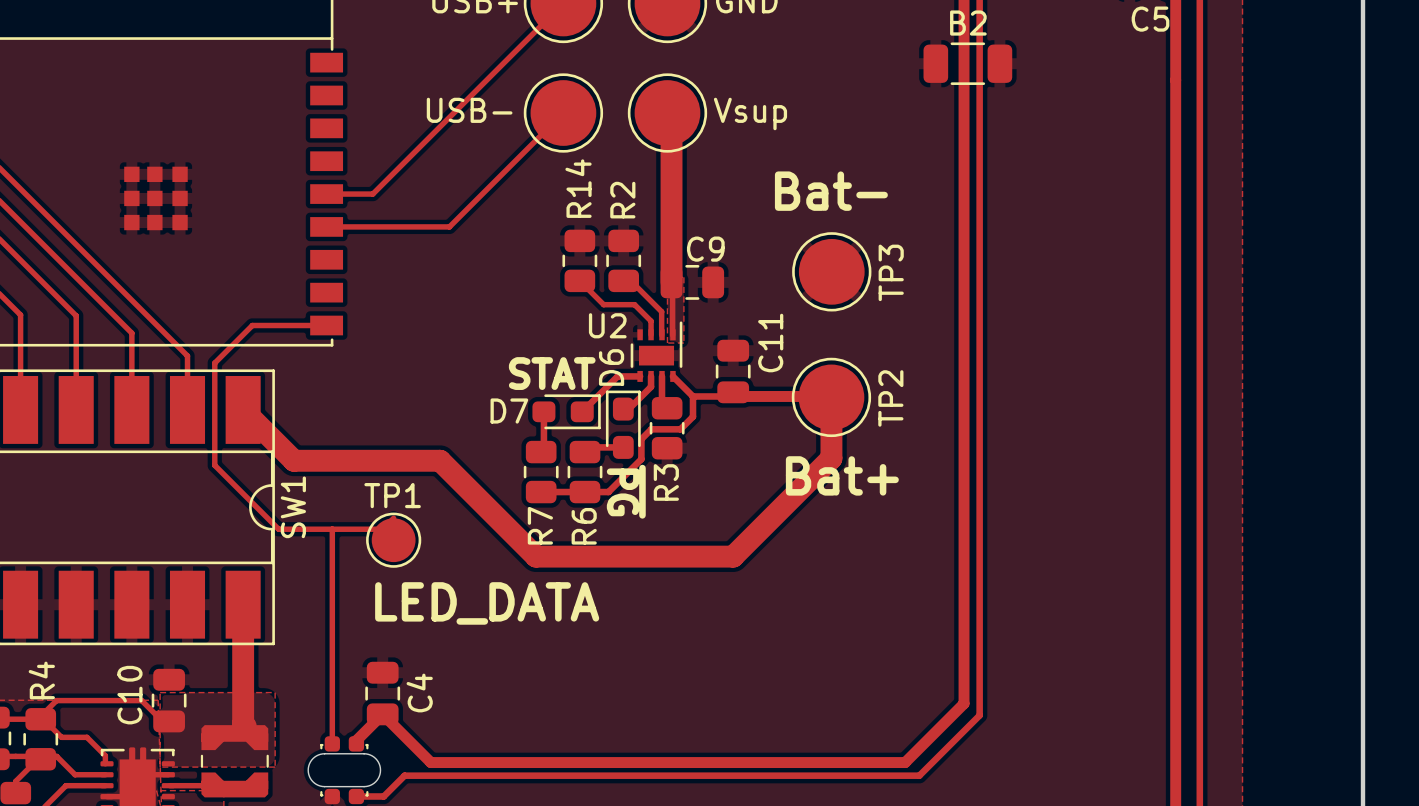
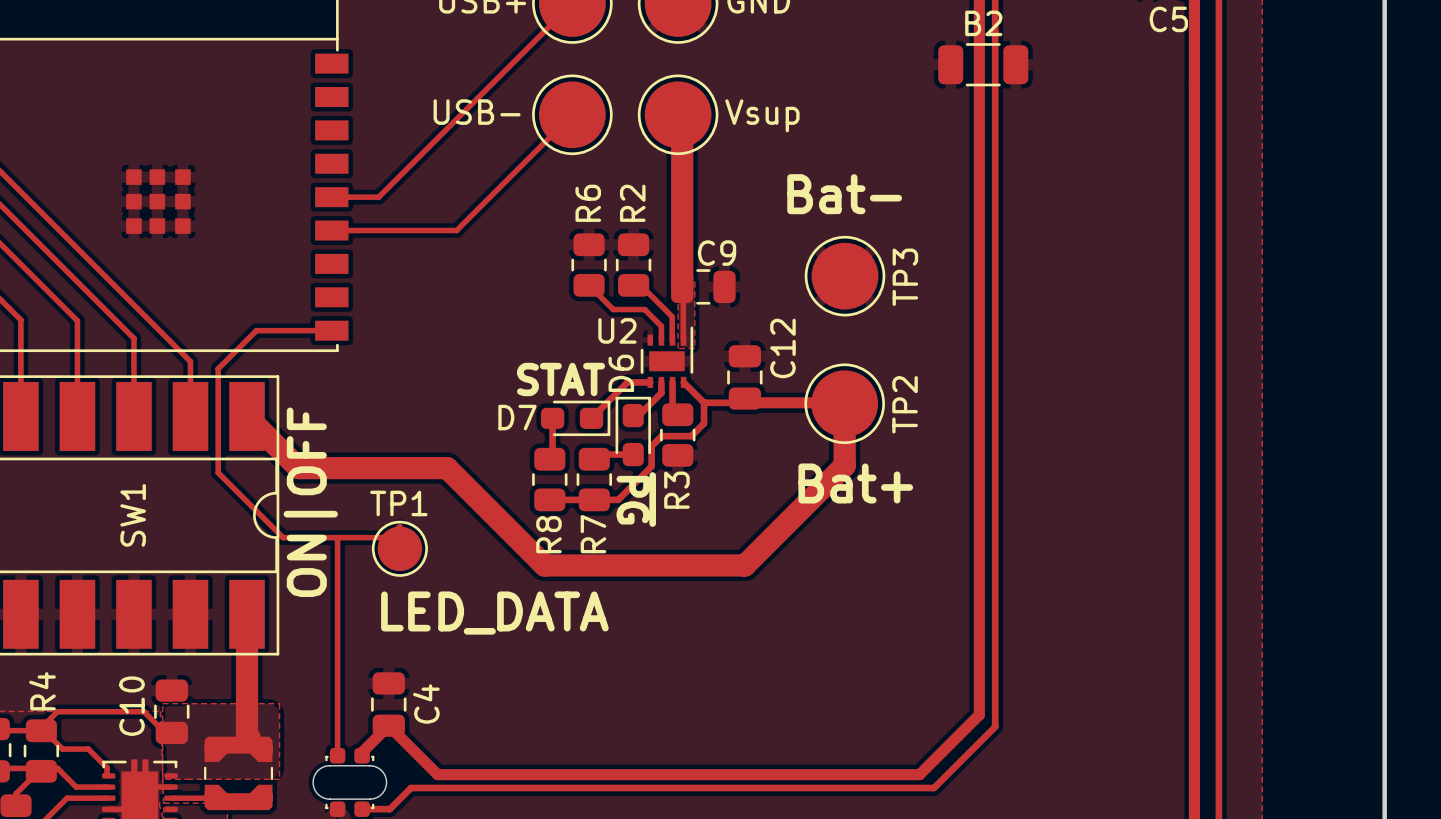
R14 name: R14 (578, 188) -> R6 (588, 203)
C11 name: C11 (770, 343) -> C12 (782, 348)
text: none -> ON|OFF (310, 502)
SW1 name position: SW1 (293, 507) -> SW1 (133, 515)
R7 name: R7 (540, 525) -> R8 (548, 534)
R6 name: R6 (584, 526) -> R7 (593, 534)

